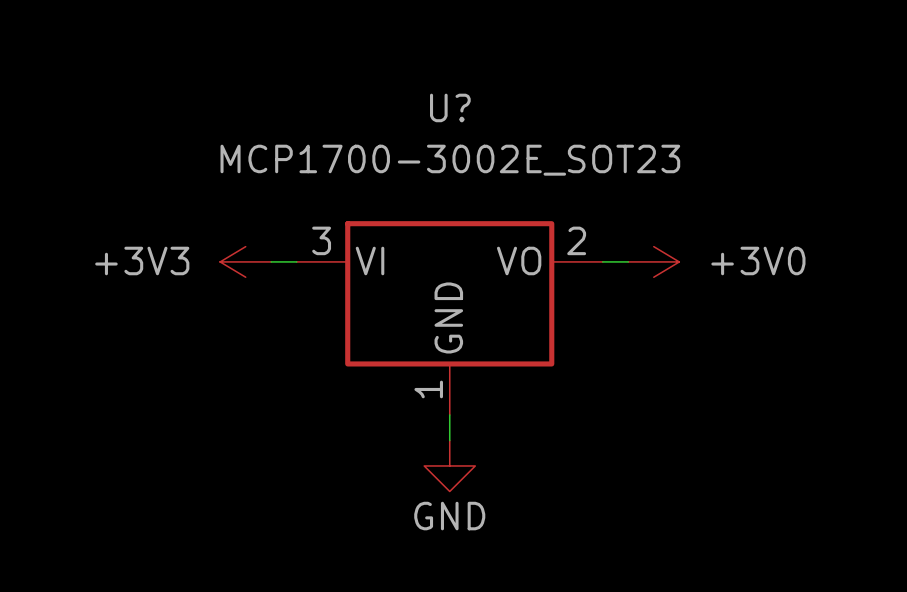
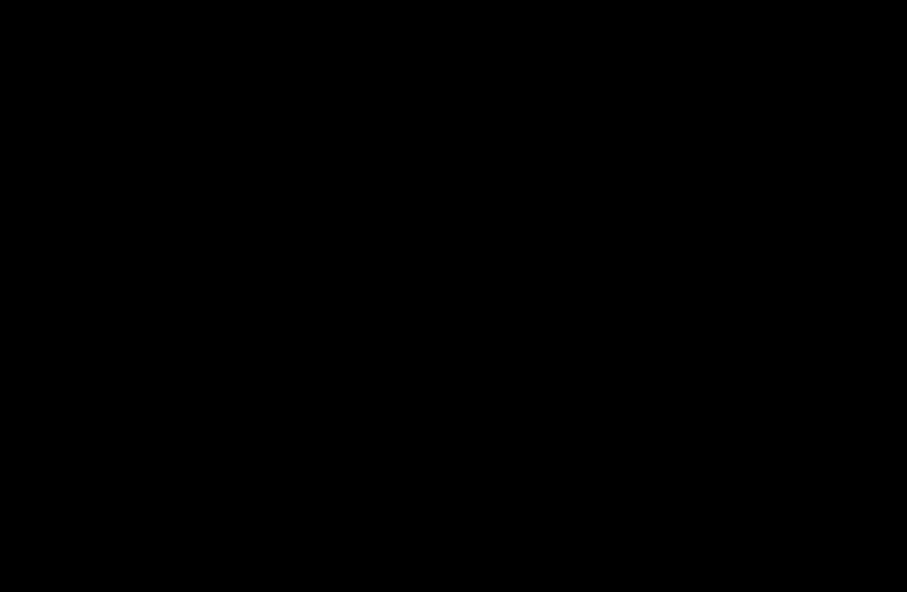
power symbol: +3V3 (245, 261) -> none
wire: (271, 261) (296, 261) -> none
wire: (602, 261) (628, 261) -> none
power symbol: +3V0 (653, 261) -> none
U?: MCP1700-3002E_SOT23 (449, 318) -> none
wire: (449, 414) (449, 440) -> none
power symbol: GND (449, 465) -> none

